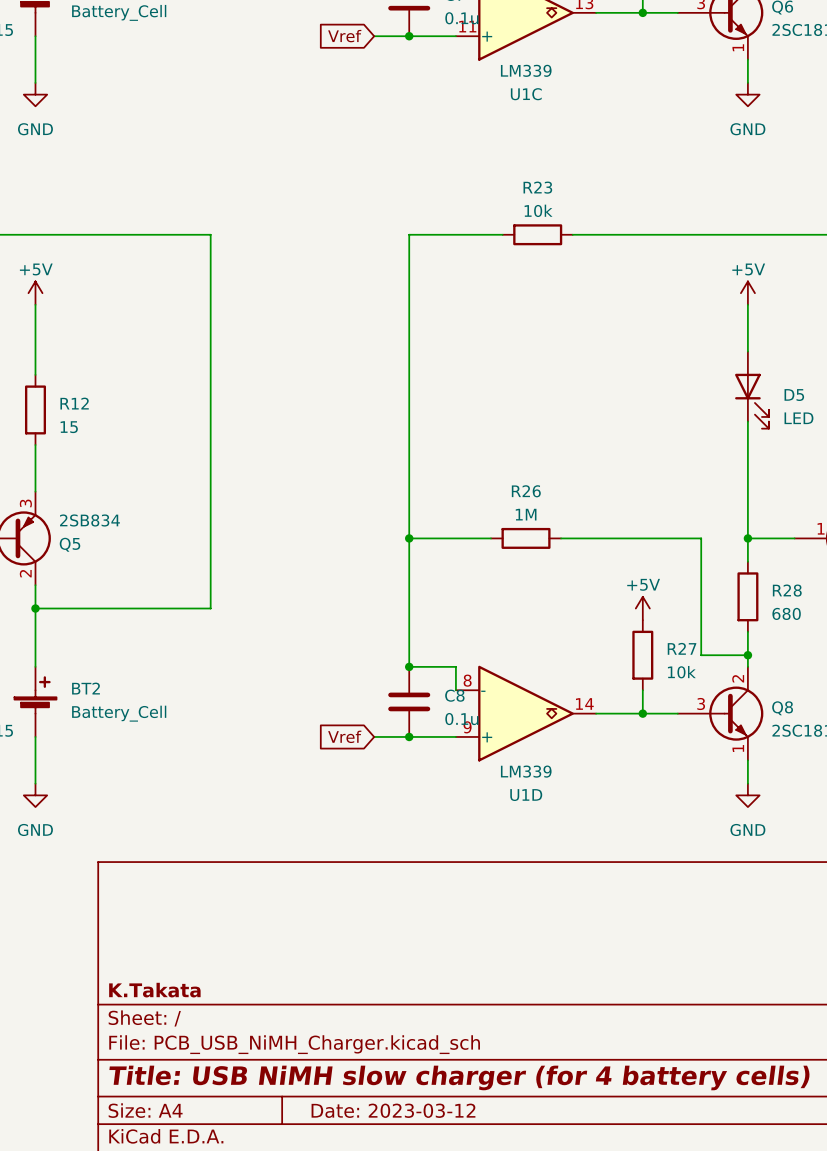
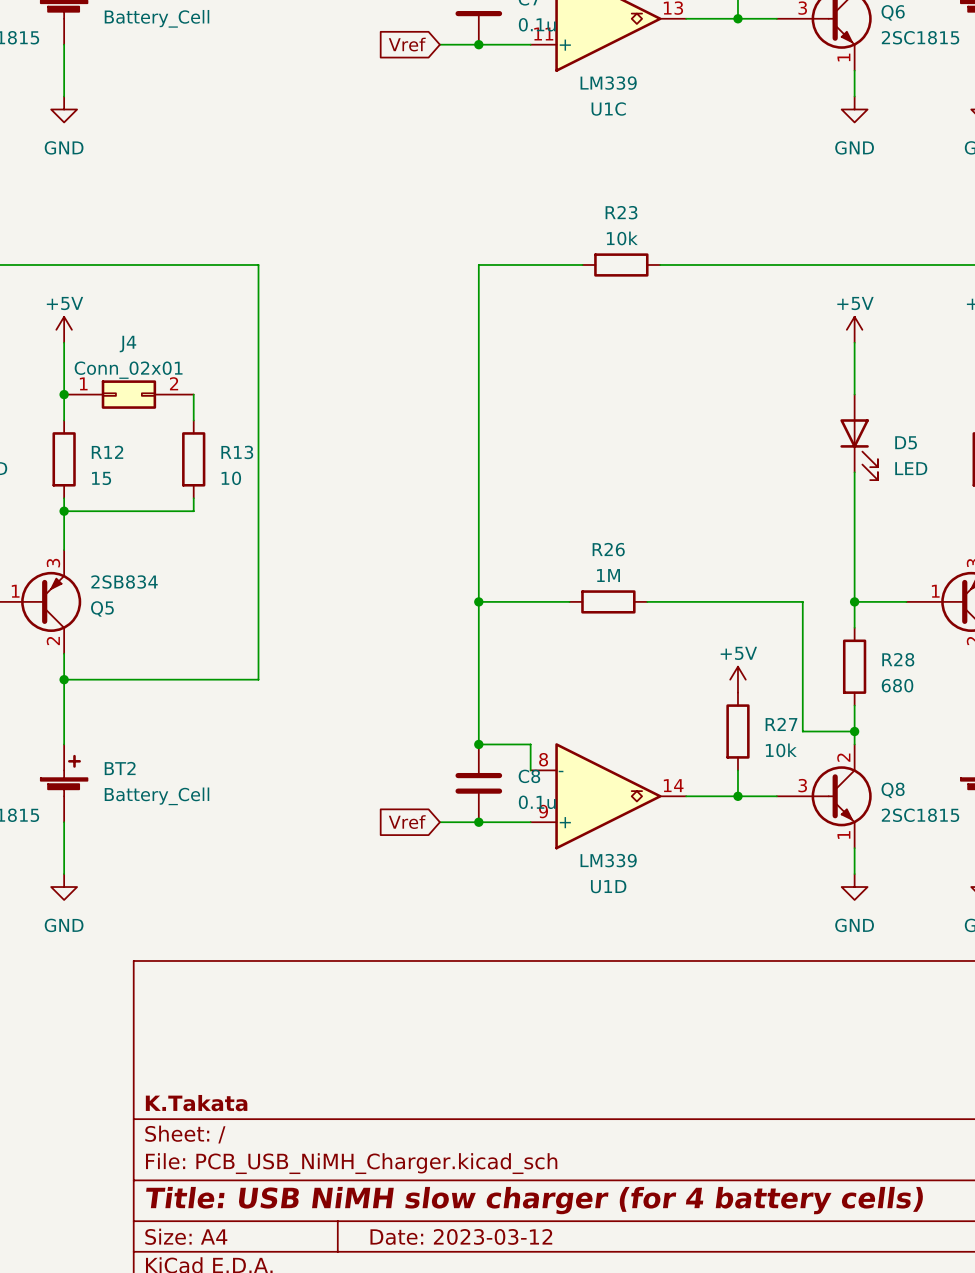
junction: none -> (64, 394)
J4: none -> Conn_02x01 (128, 394)
wire: none -> (193, 394) (193, 420)
R13: none -> 10 (193, 459)
wire: none -> (193, 498) (193, 511) (64, 511)
junction: none -> (64, 511)

